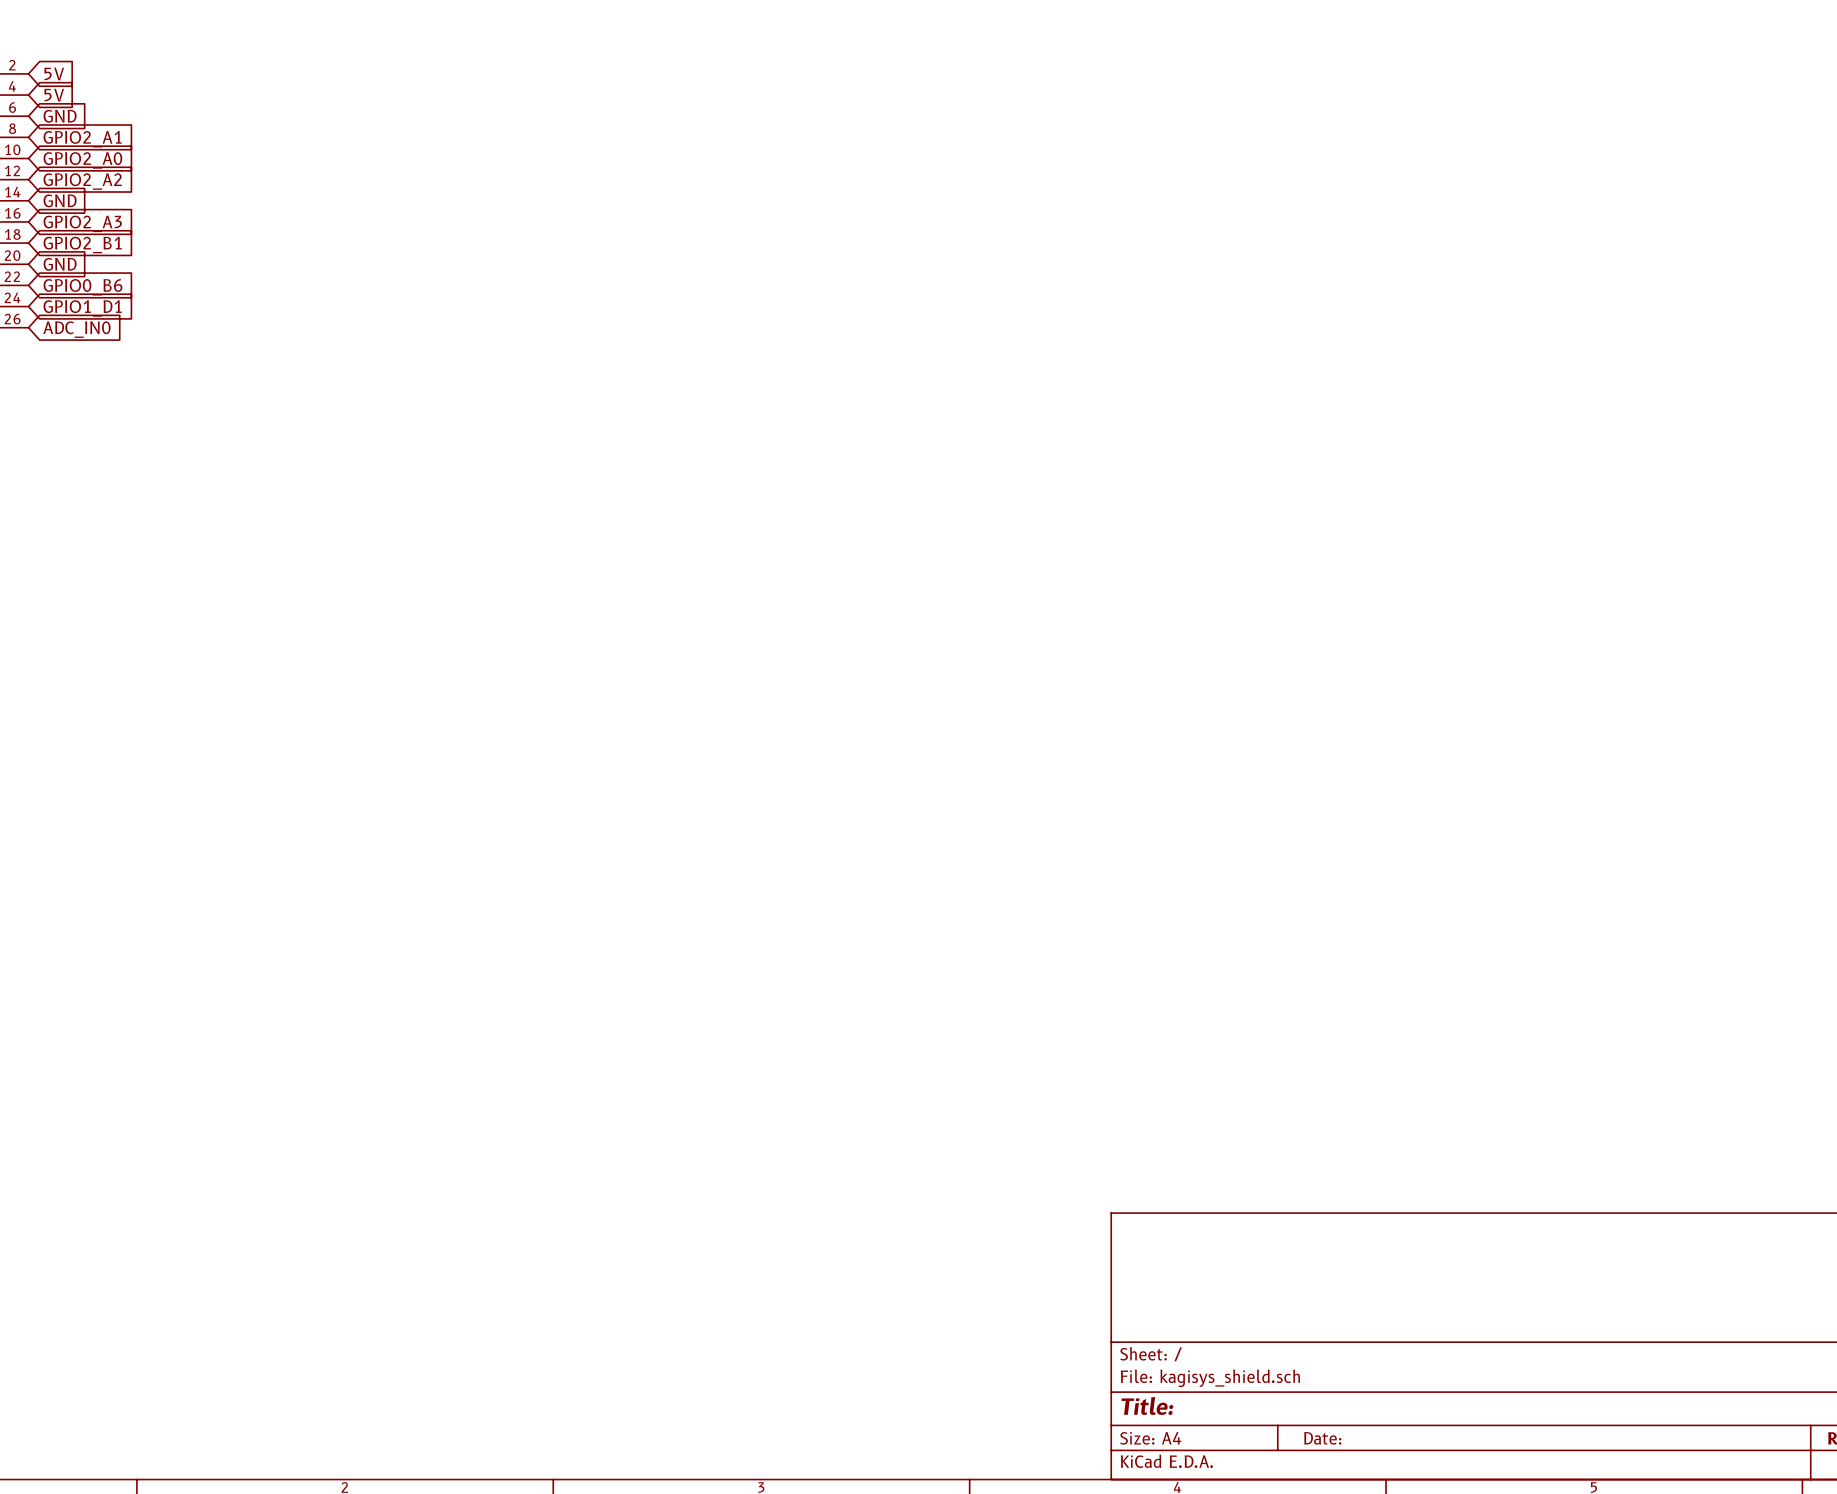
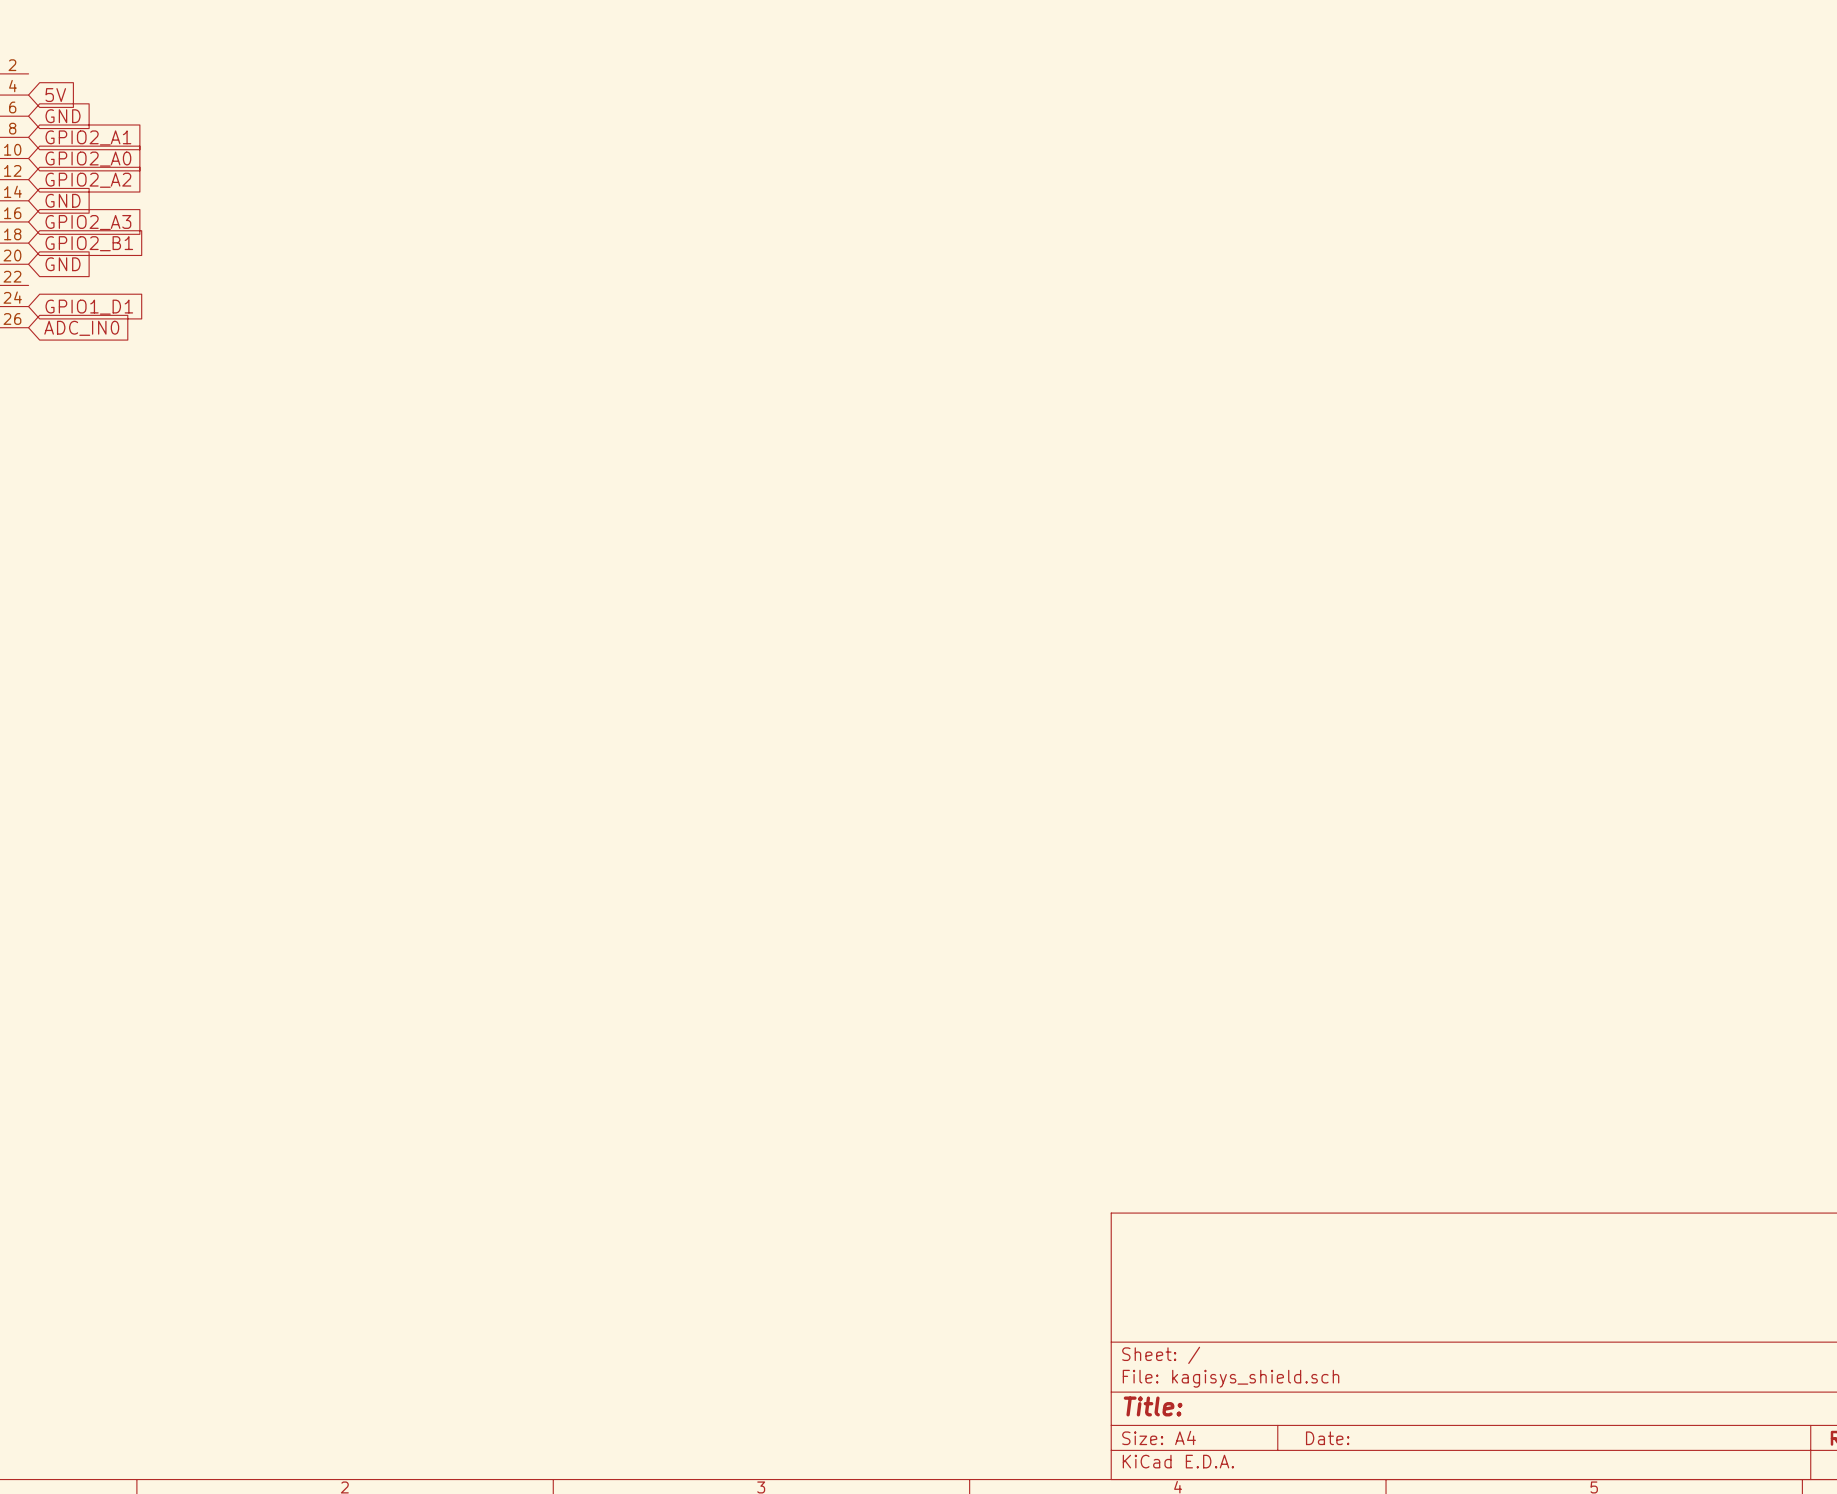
global label: 5V (54, 73) -> none
global label: GPIO0_B6 (82, 287) -> none

